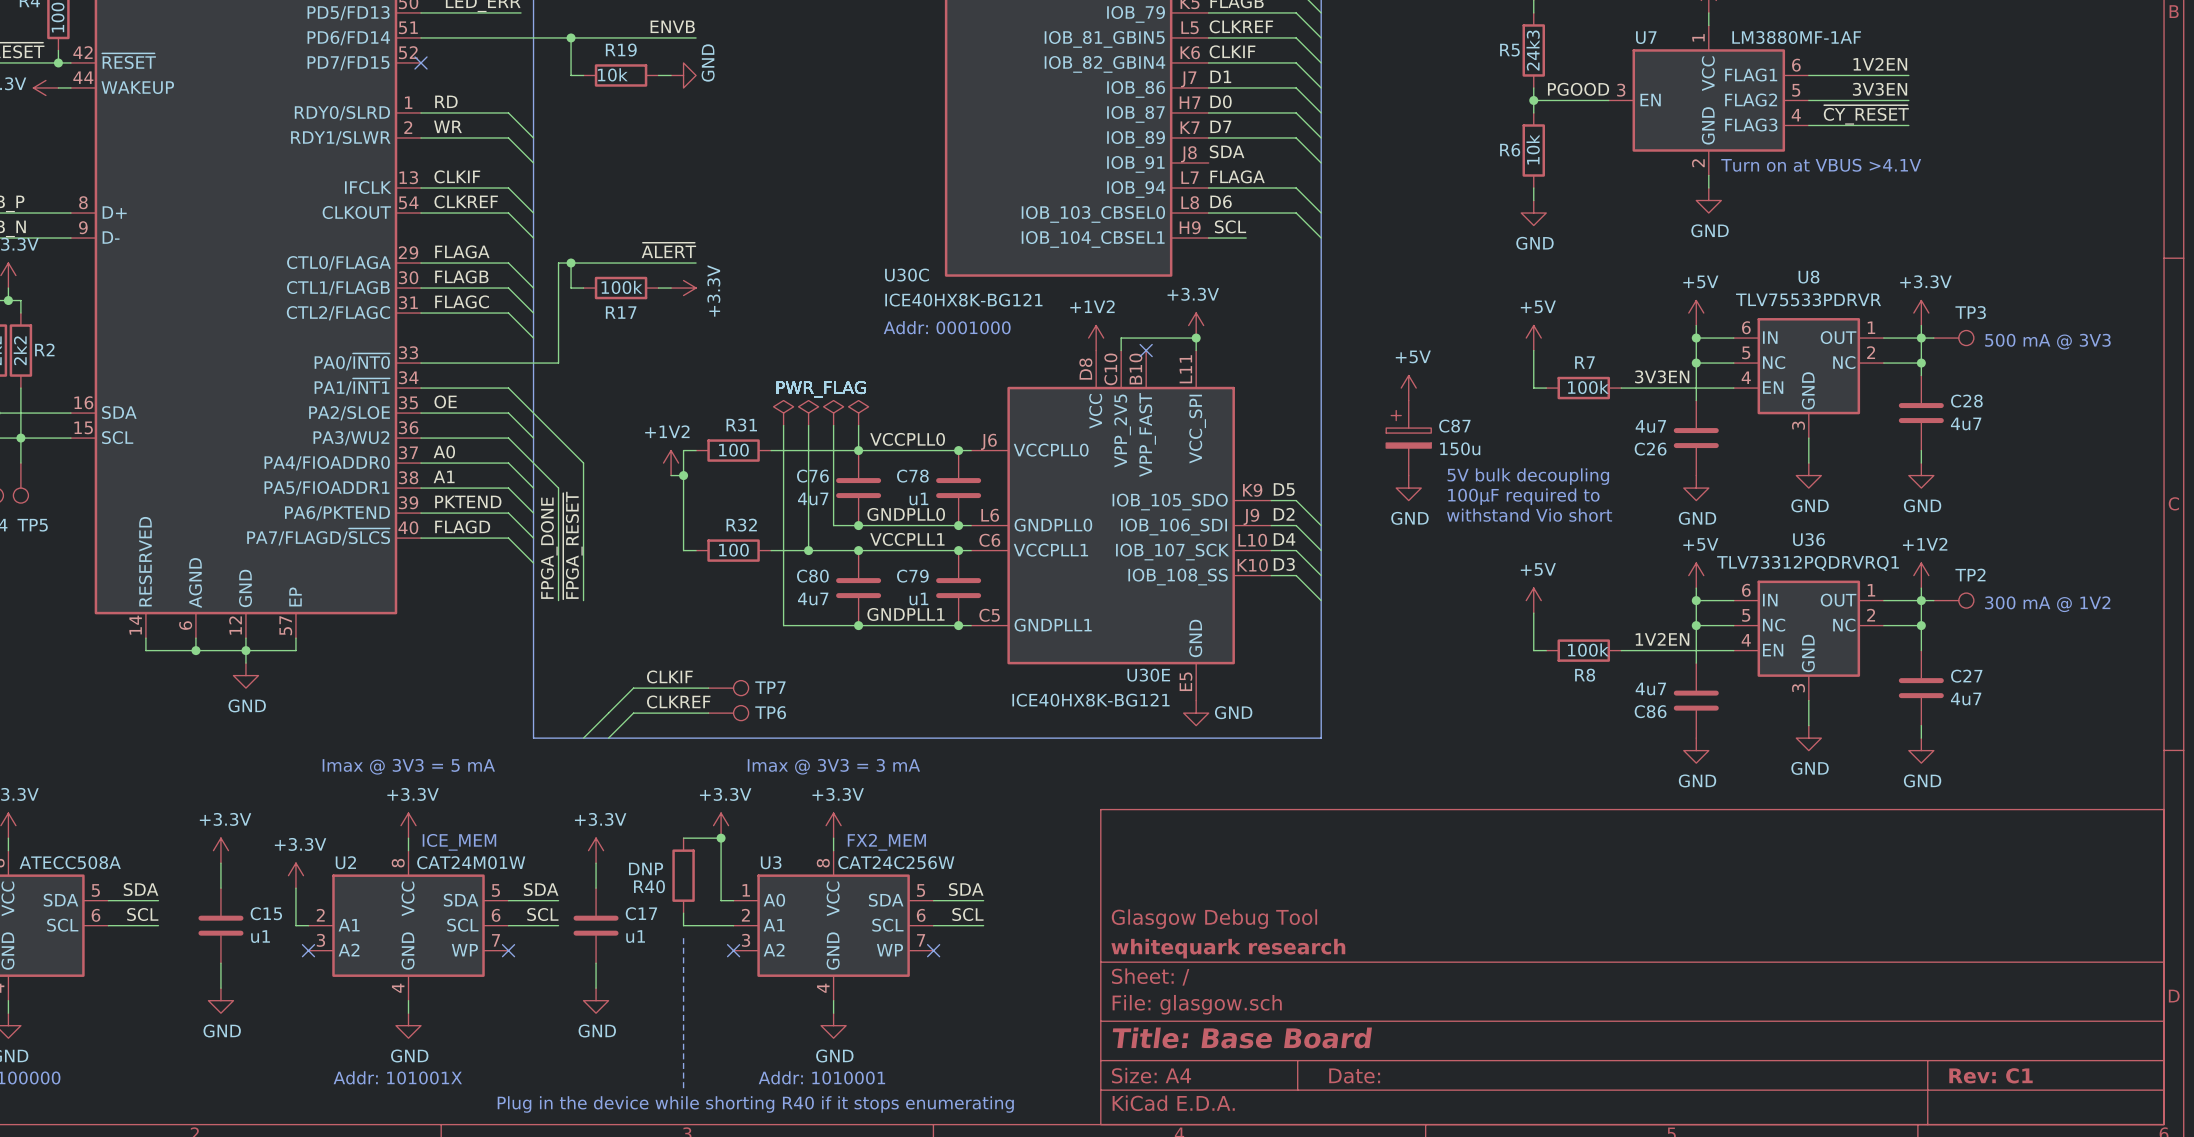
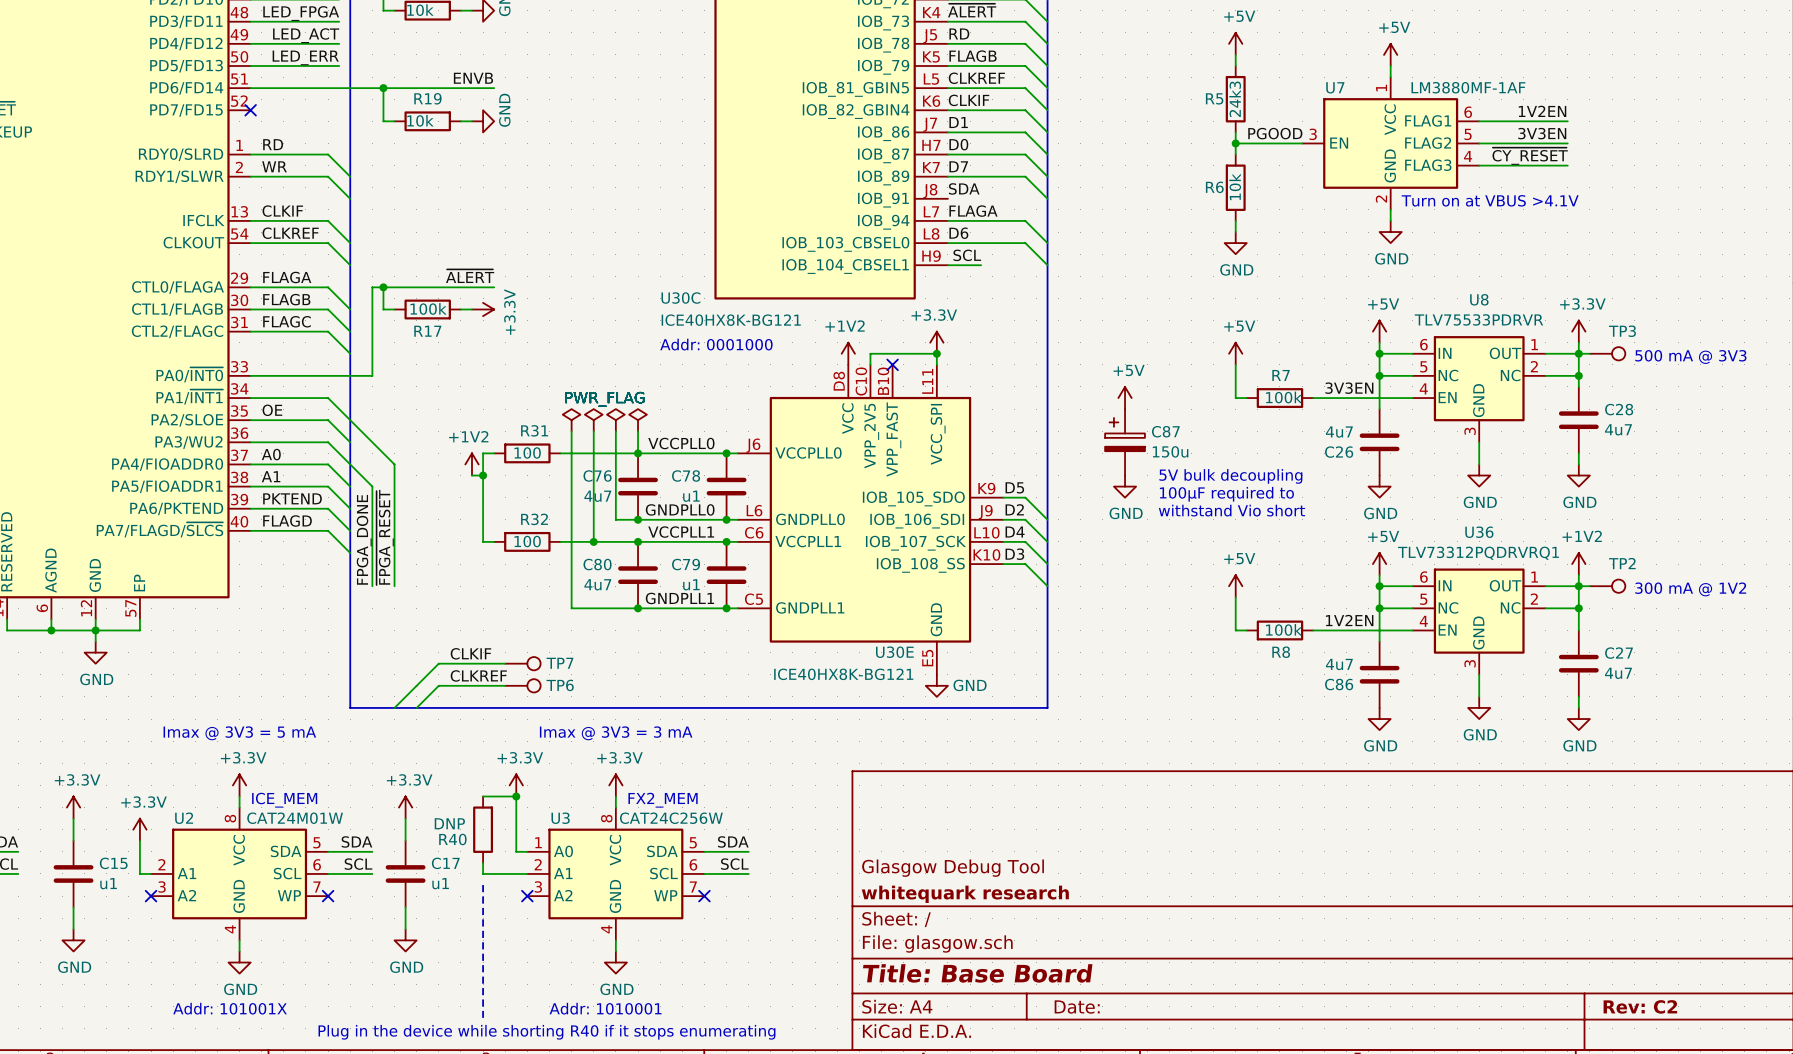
title block: Rev: C1 (1991, 1075) -> Rev: C2 (1640, 1006)

